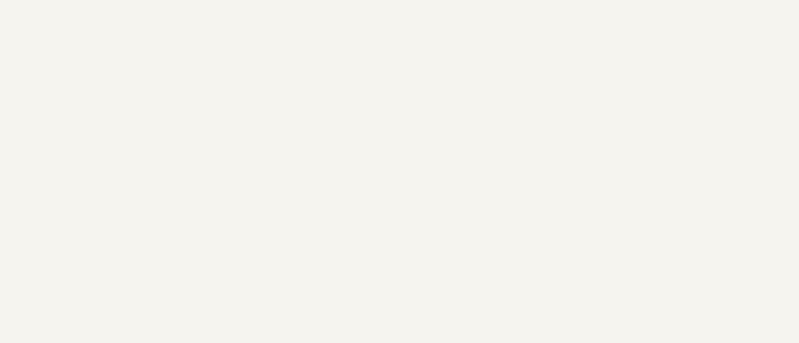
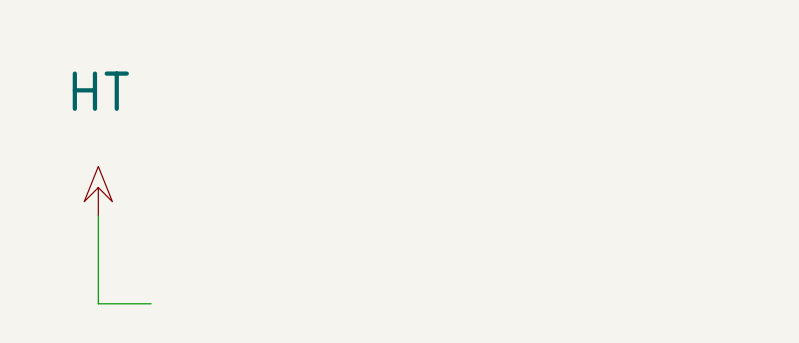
power symbol: none -> HT (98, 191)
wire: none -> (98, 215) (98, 303) (151, 303)

